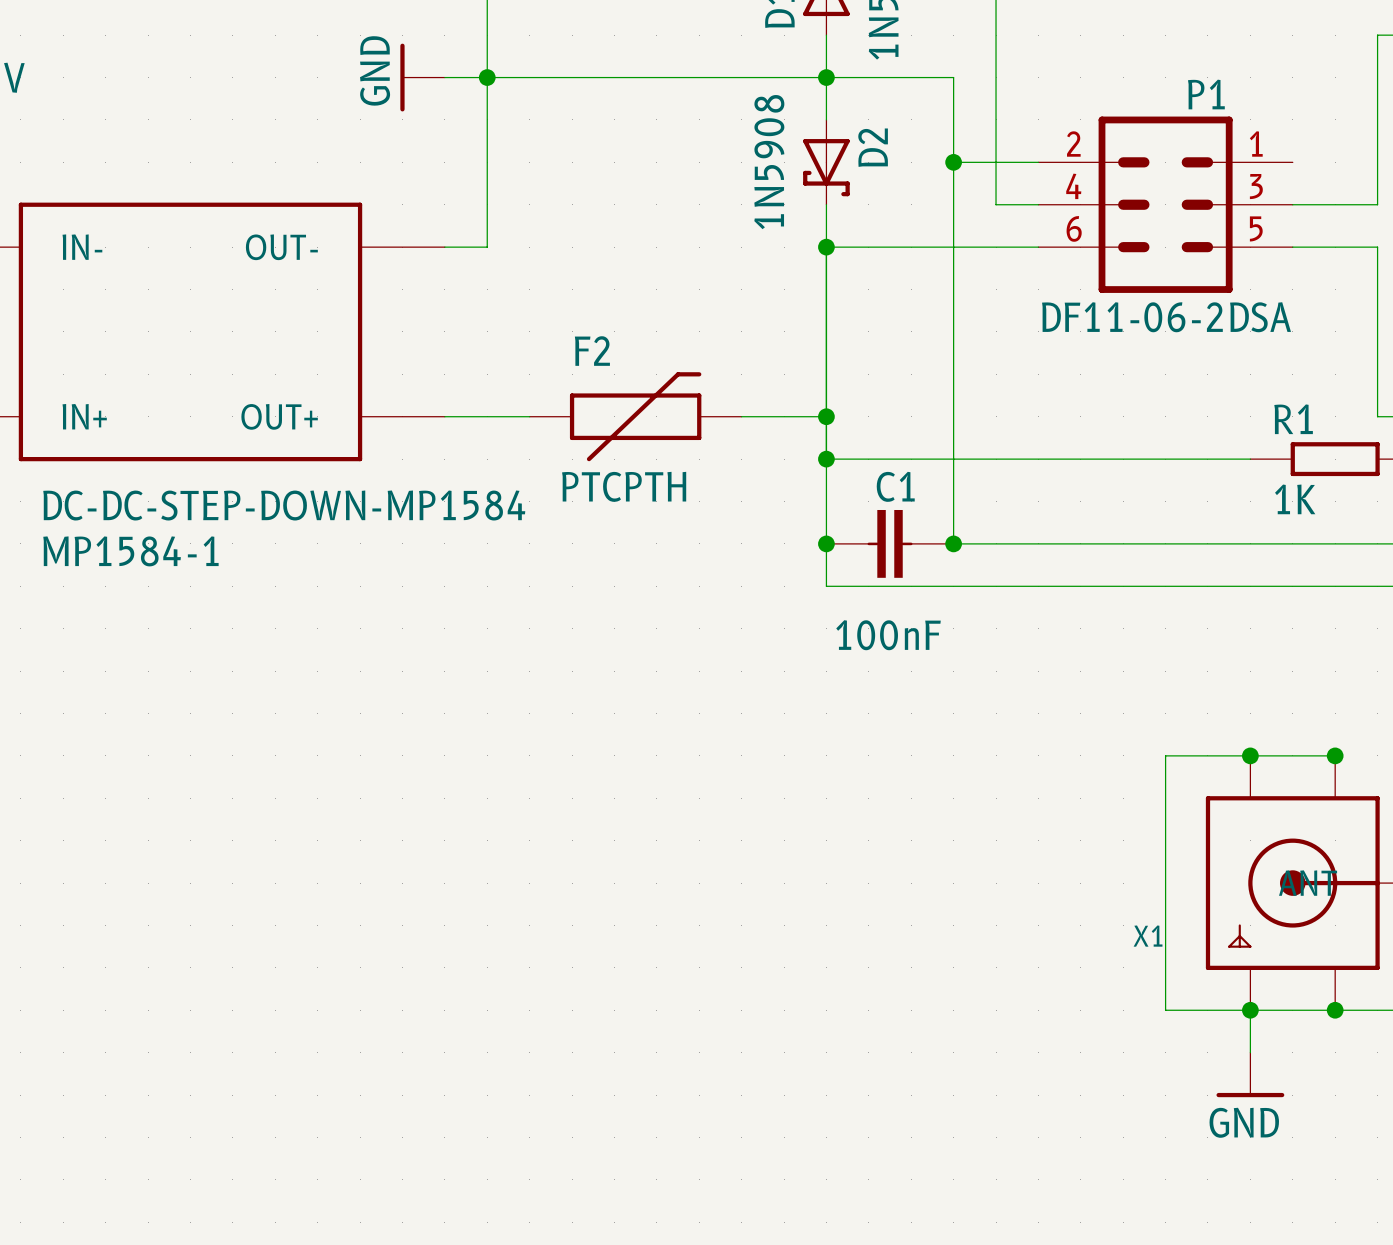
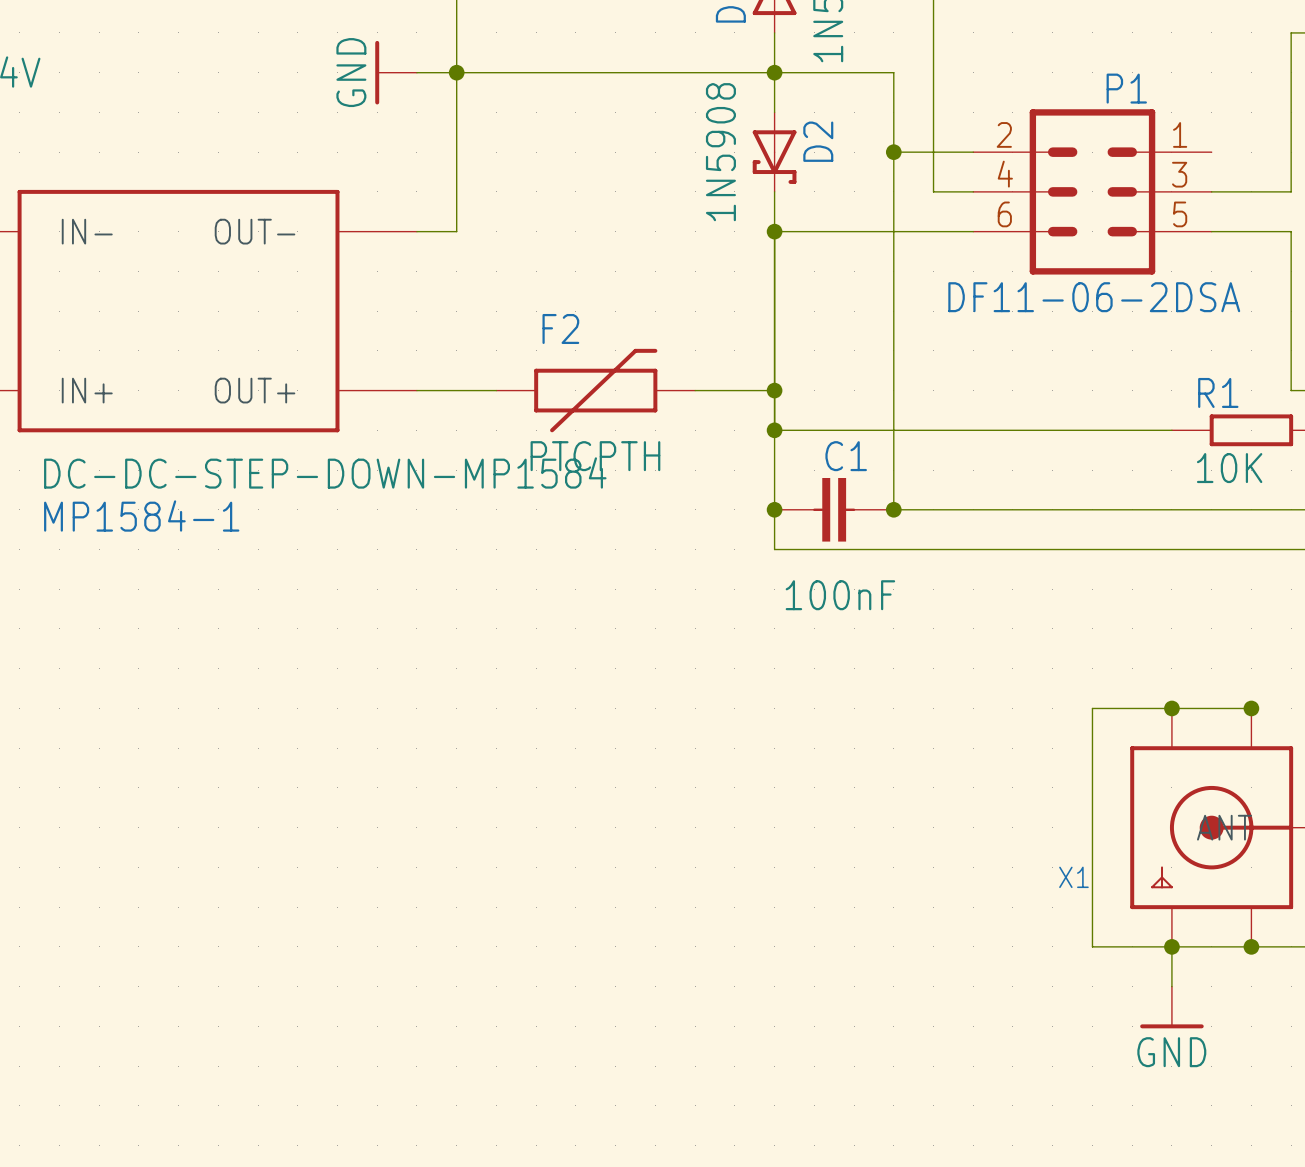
R1 value: 1K (1295, 499) -> 10K (1229, 468)

